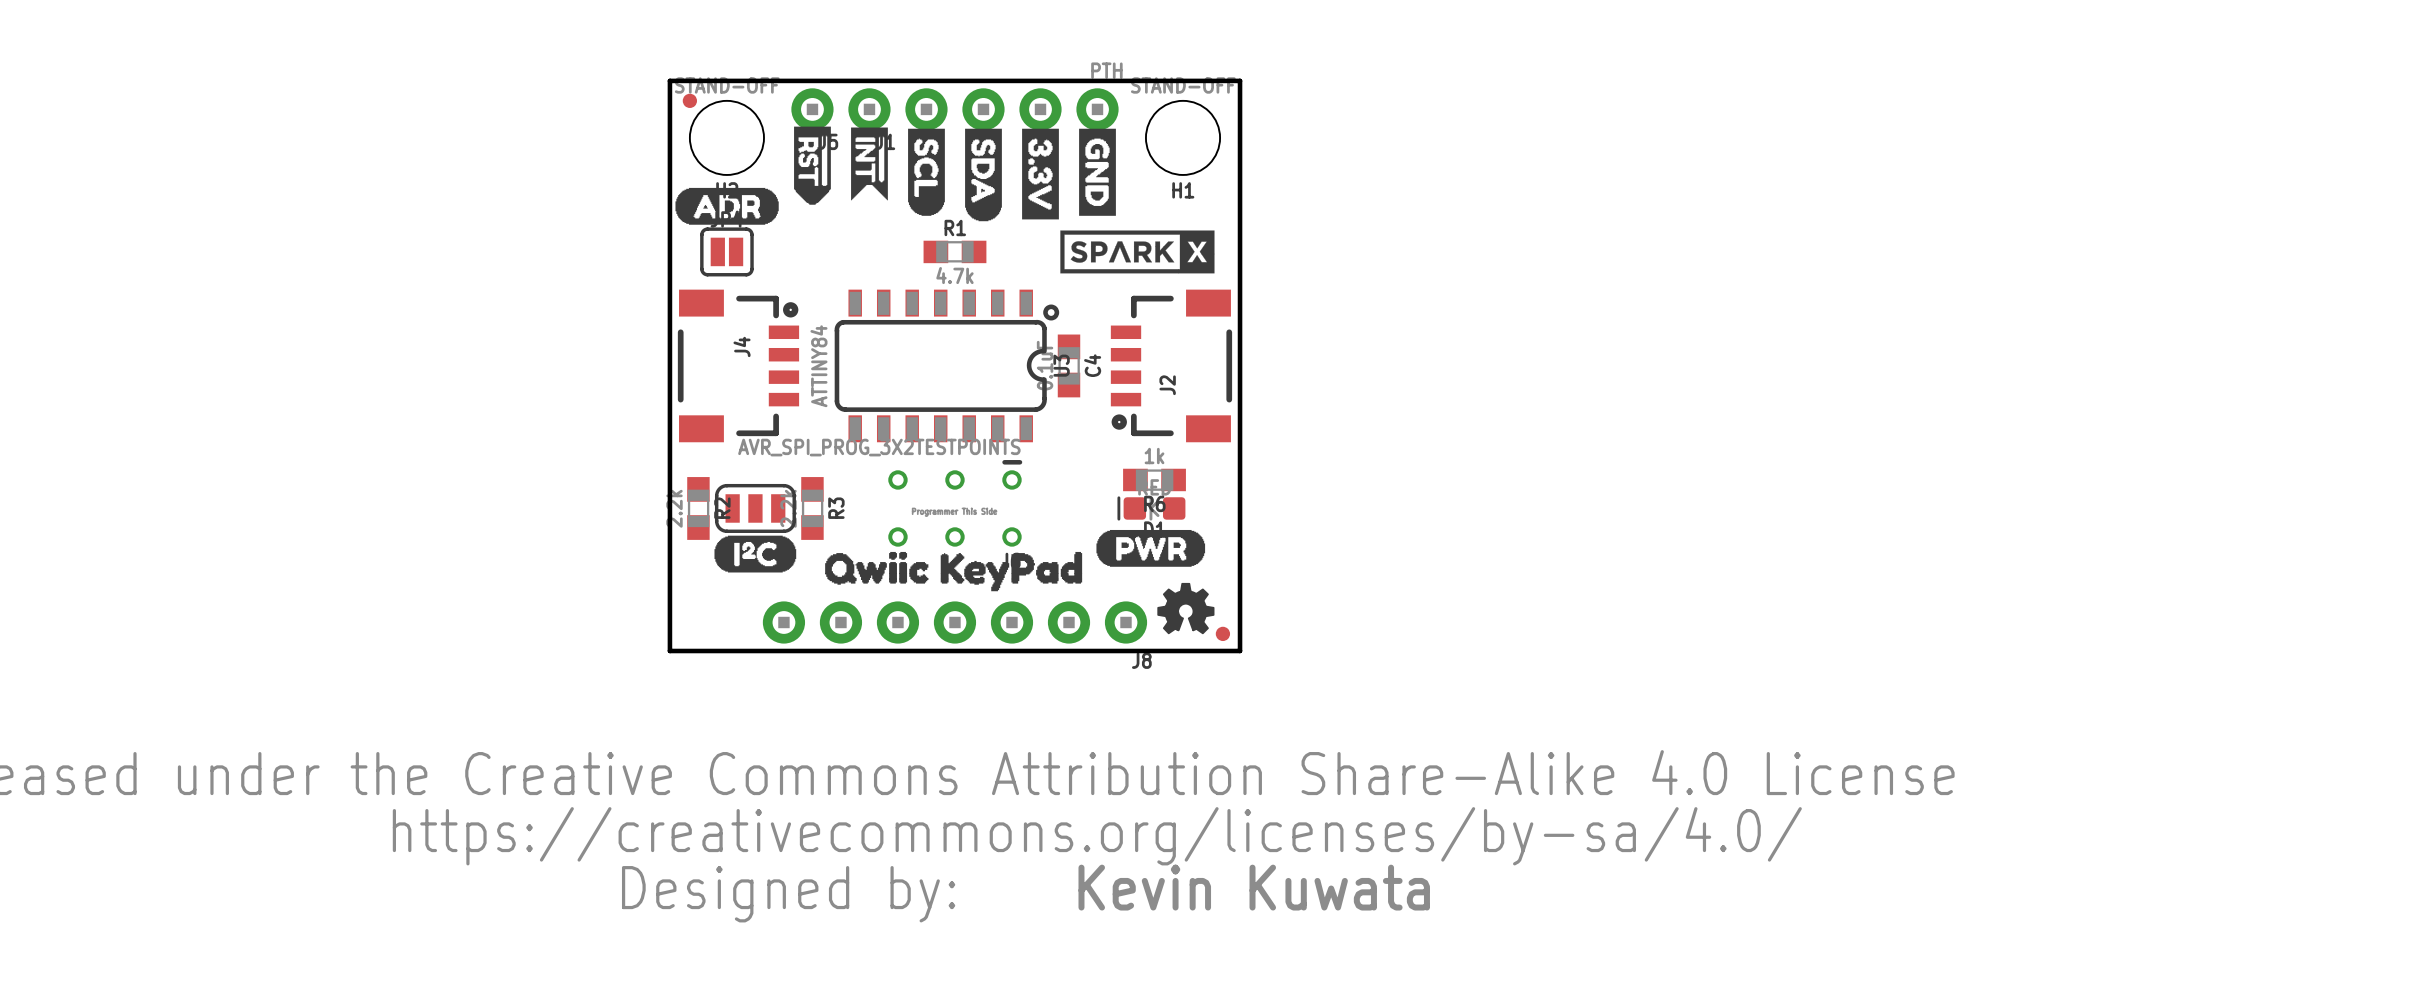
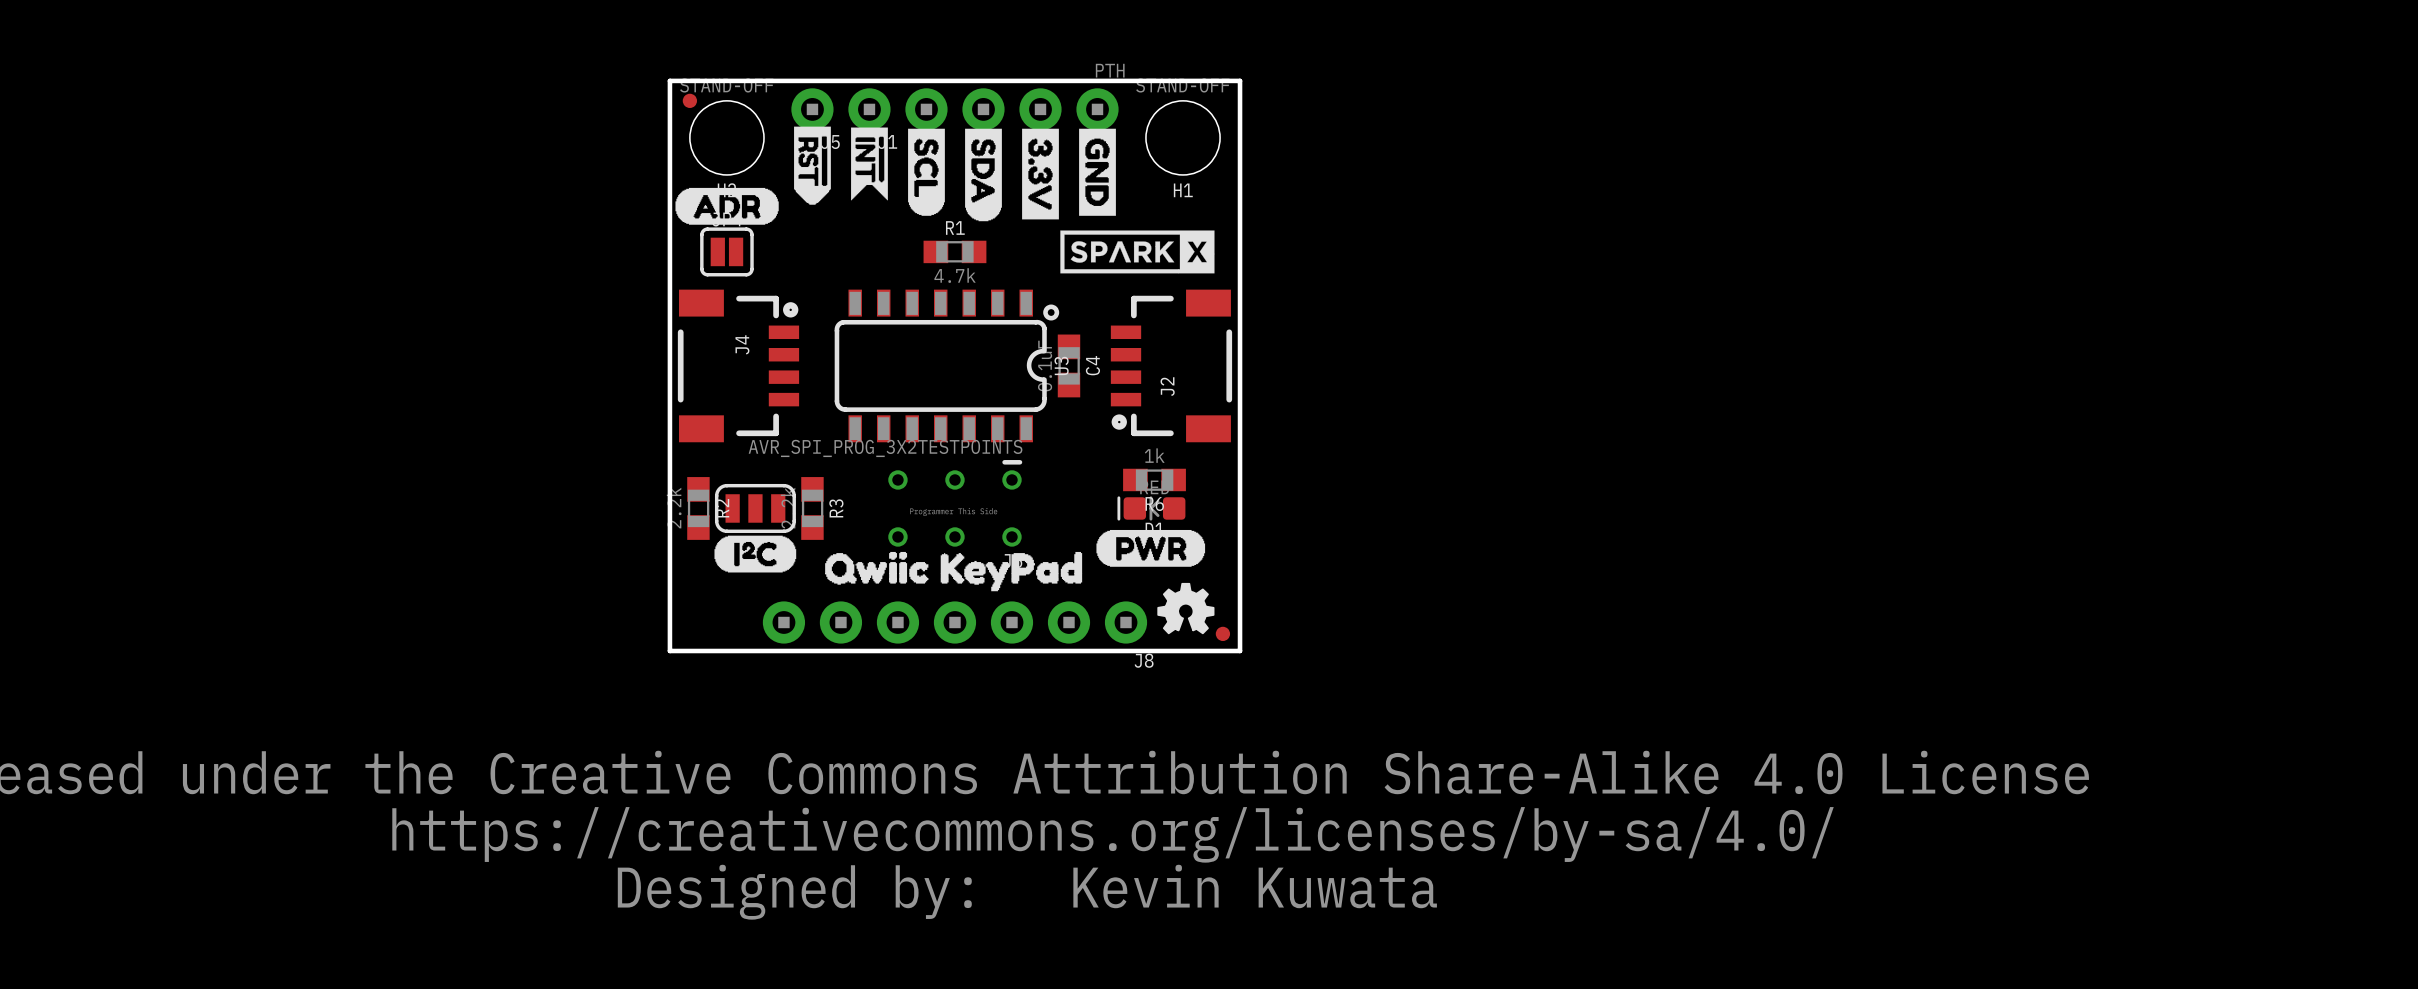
U3 value: ATTINY84 (818, 366) -> none

